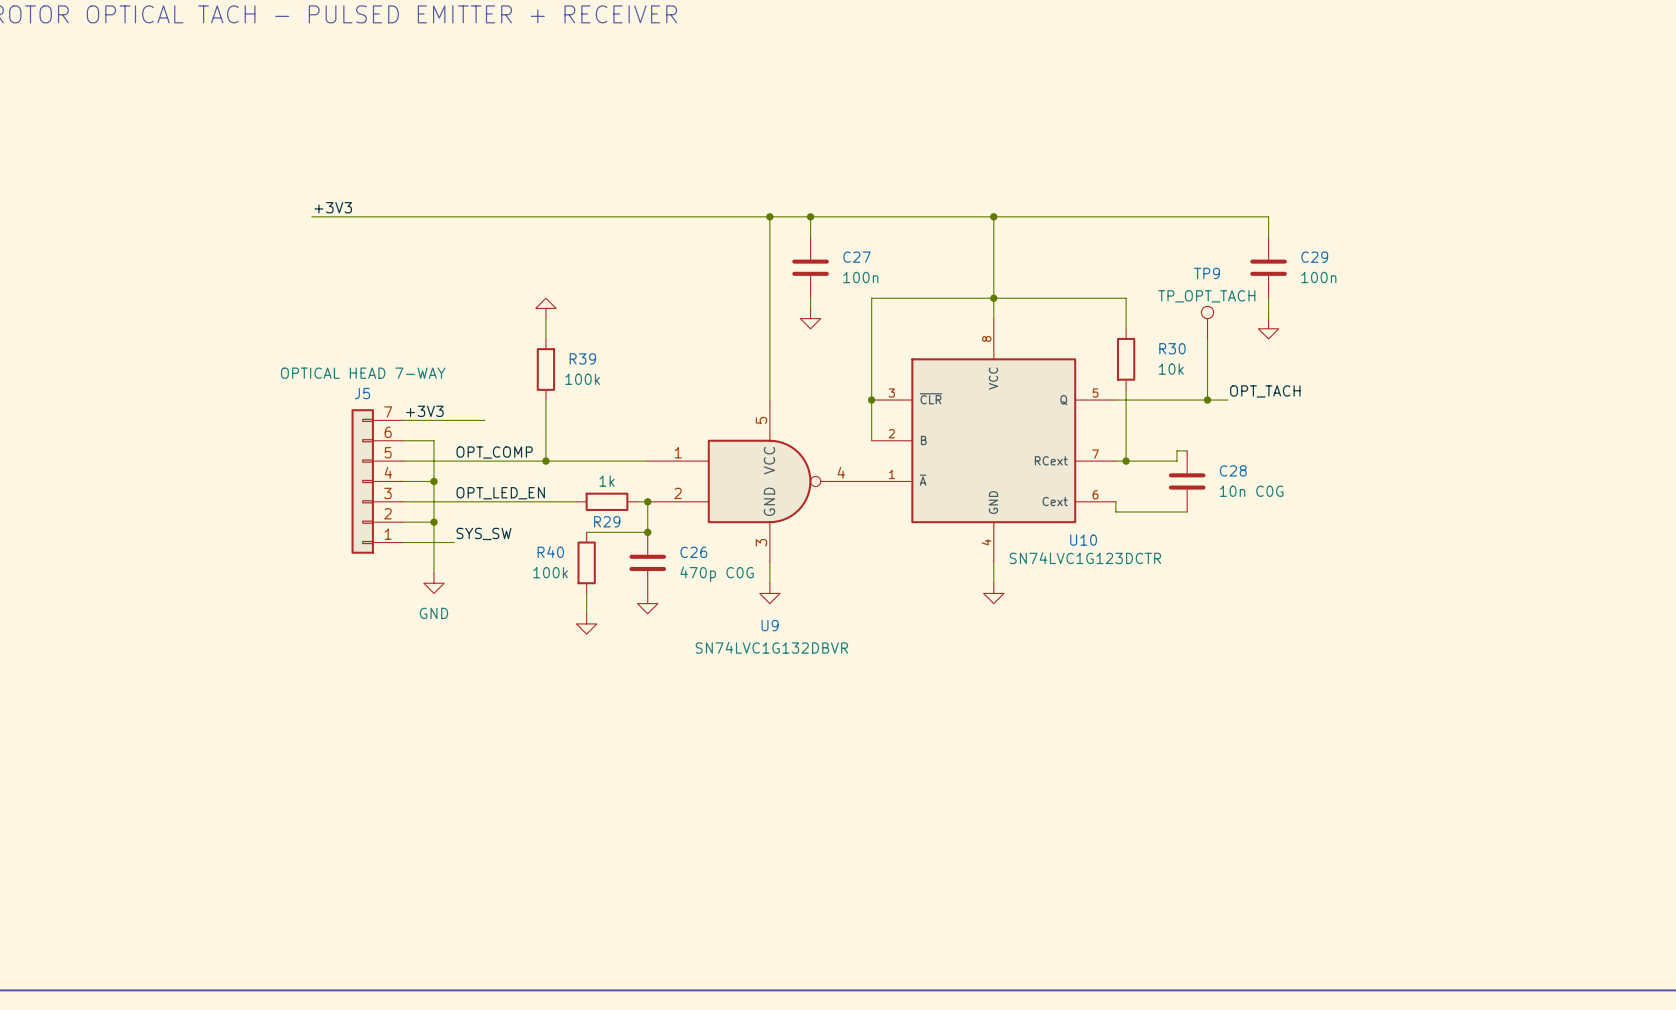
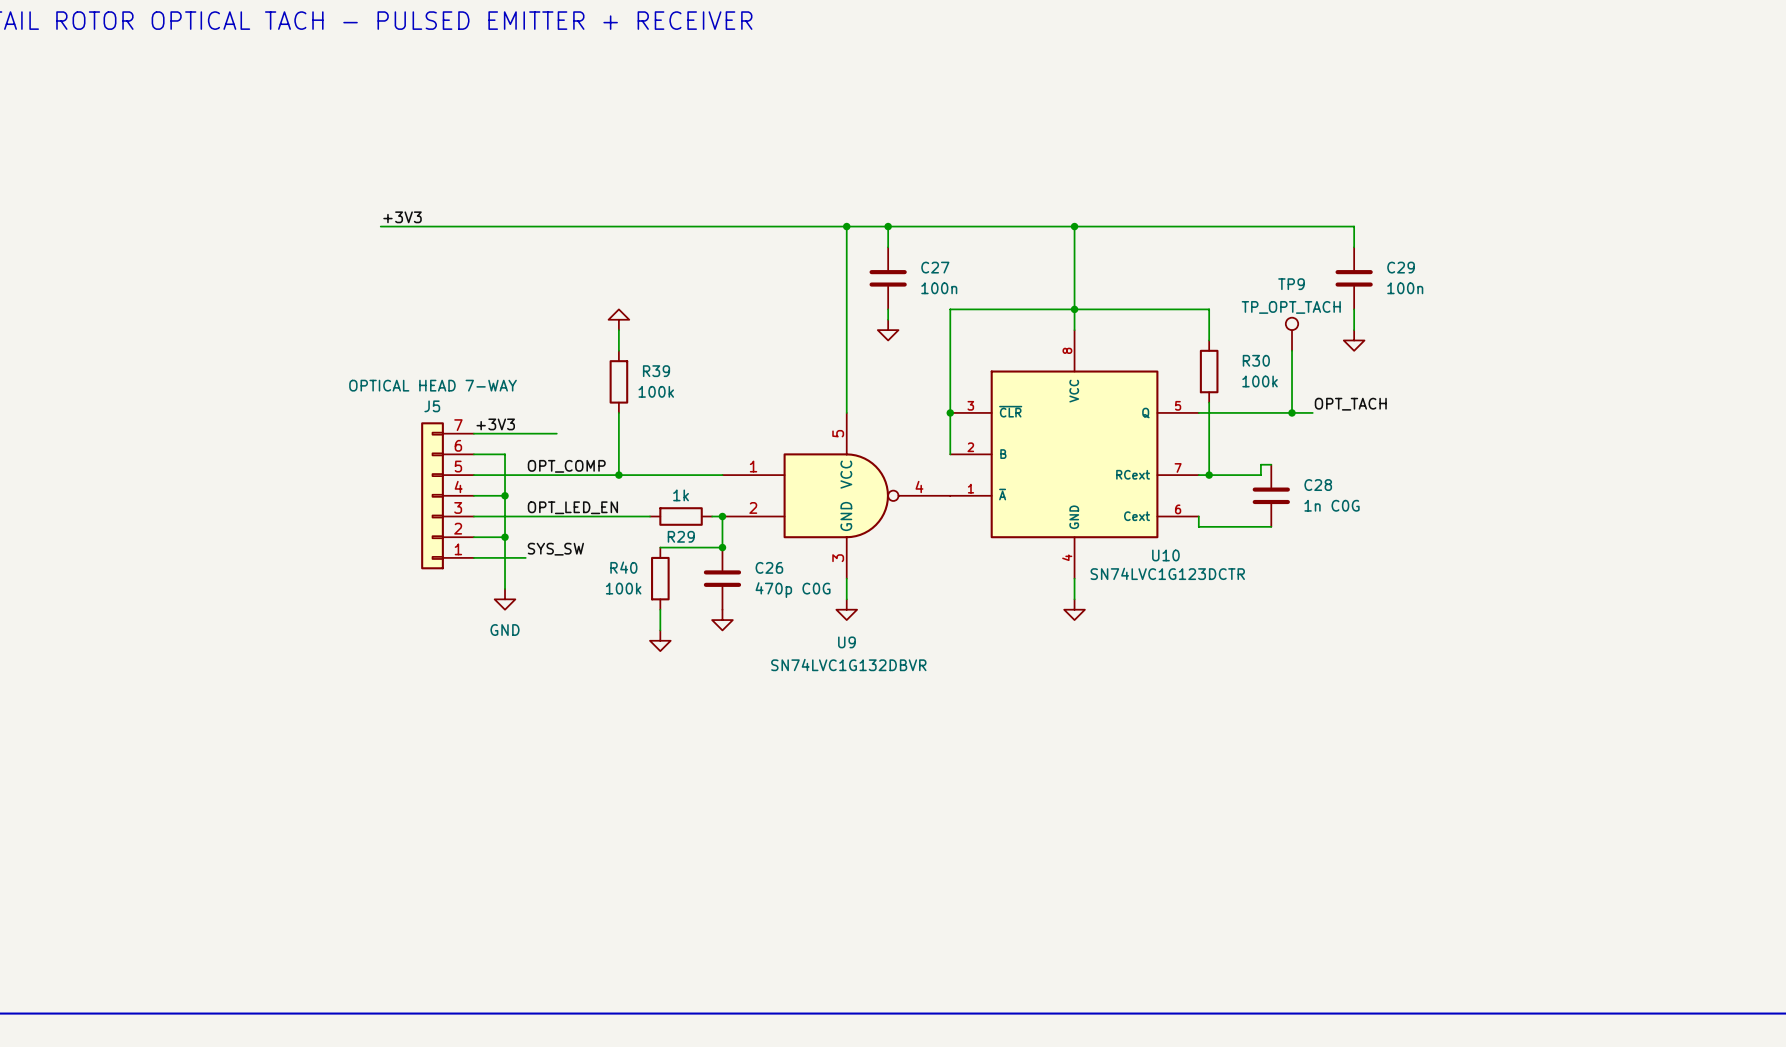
R30 value: 10k (1171, 369) -> 100k (1260, 381)
C28 value: 10n C0G (1251, 491) -> 1n C0G (1332, 505)

